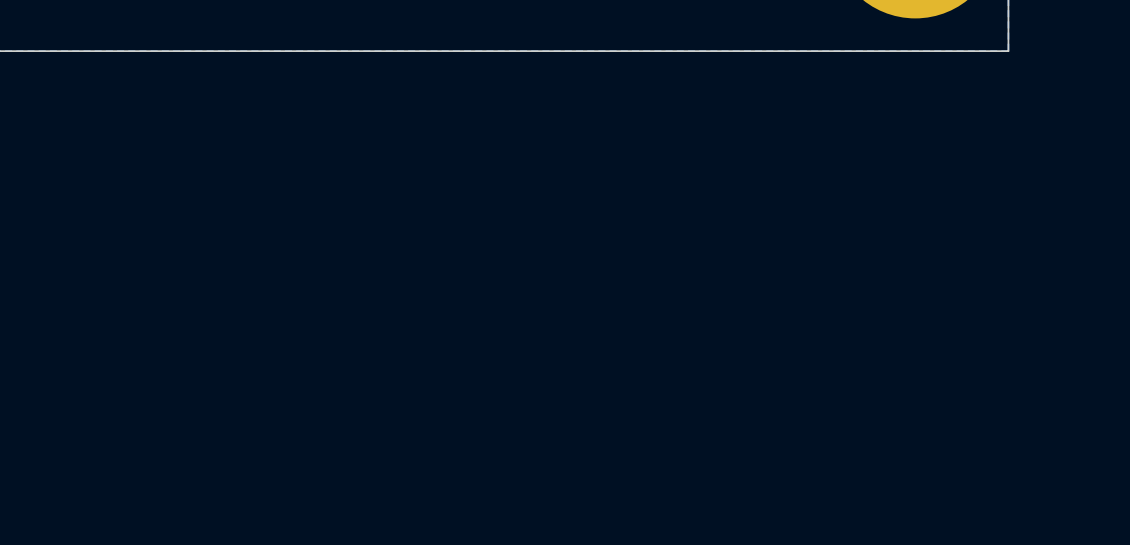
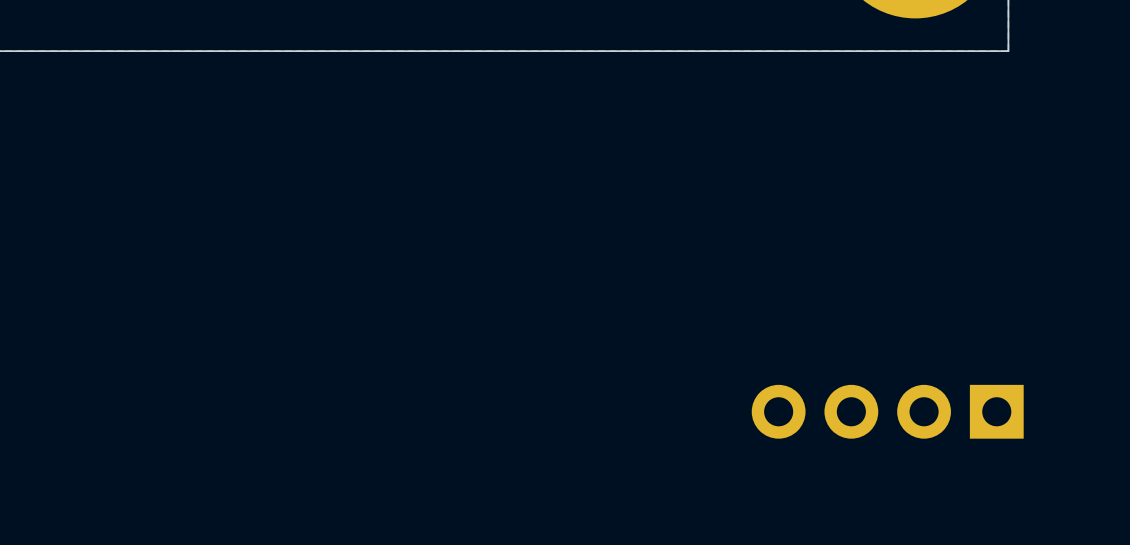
part: none -> (887, 411)

